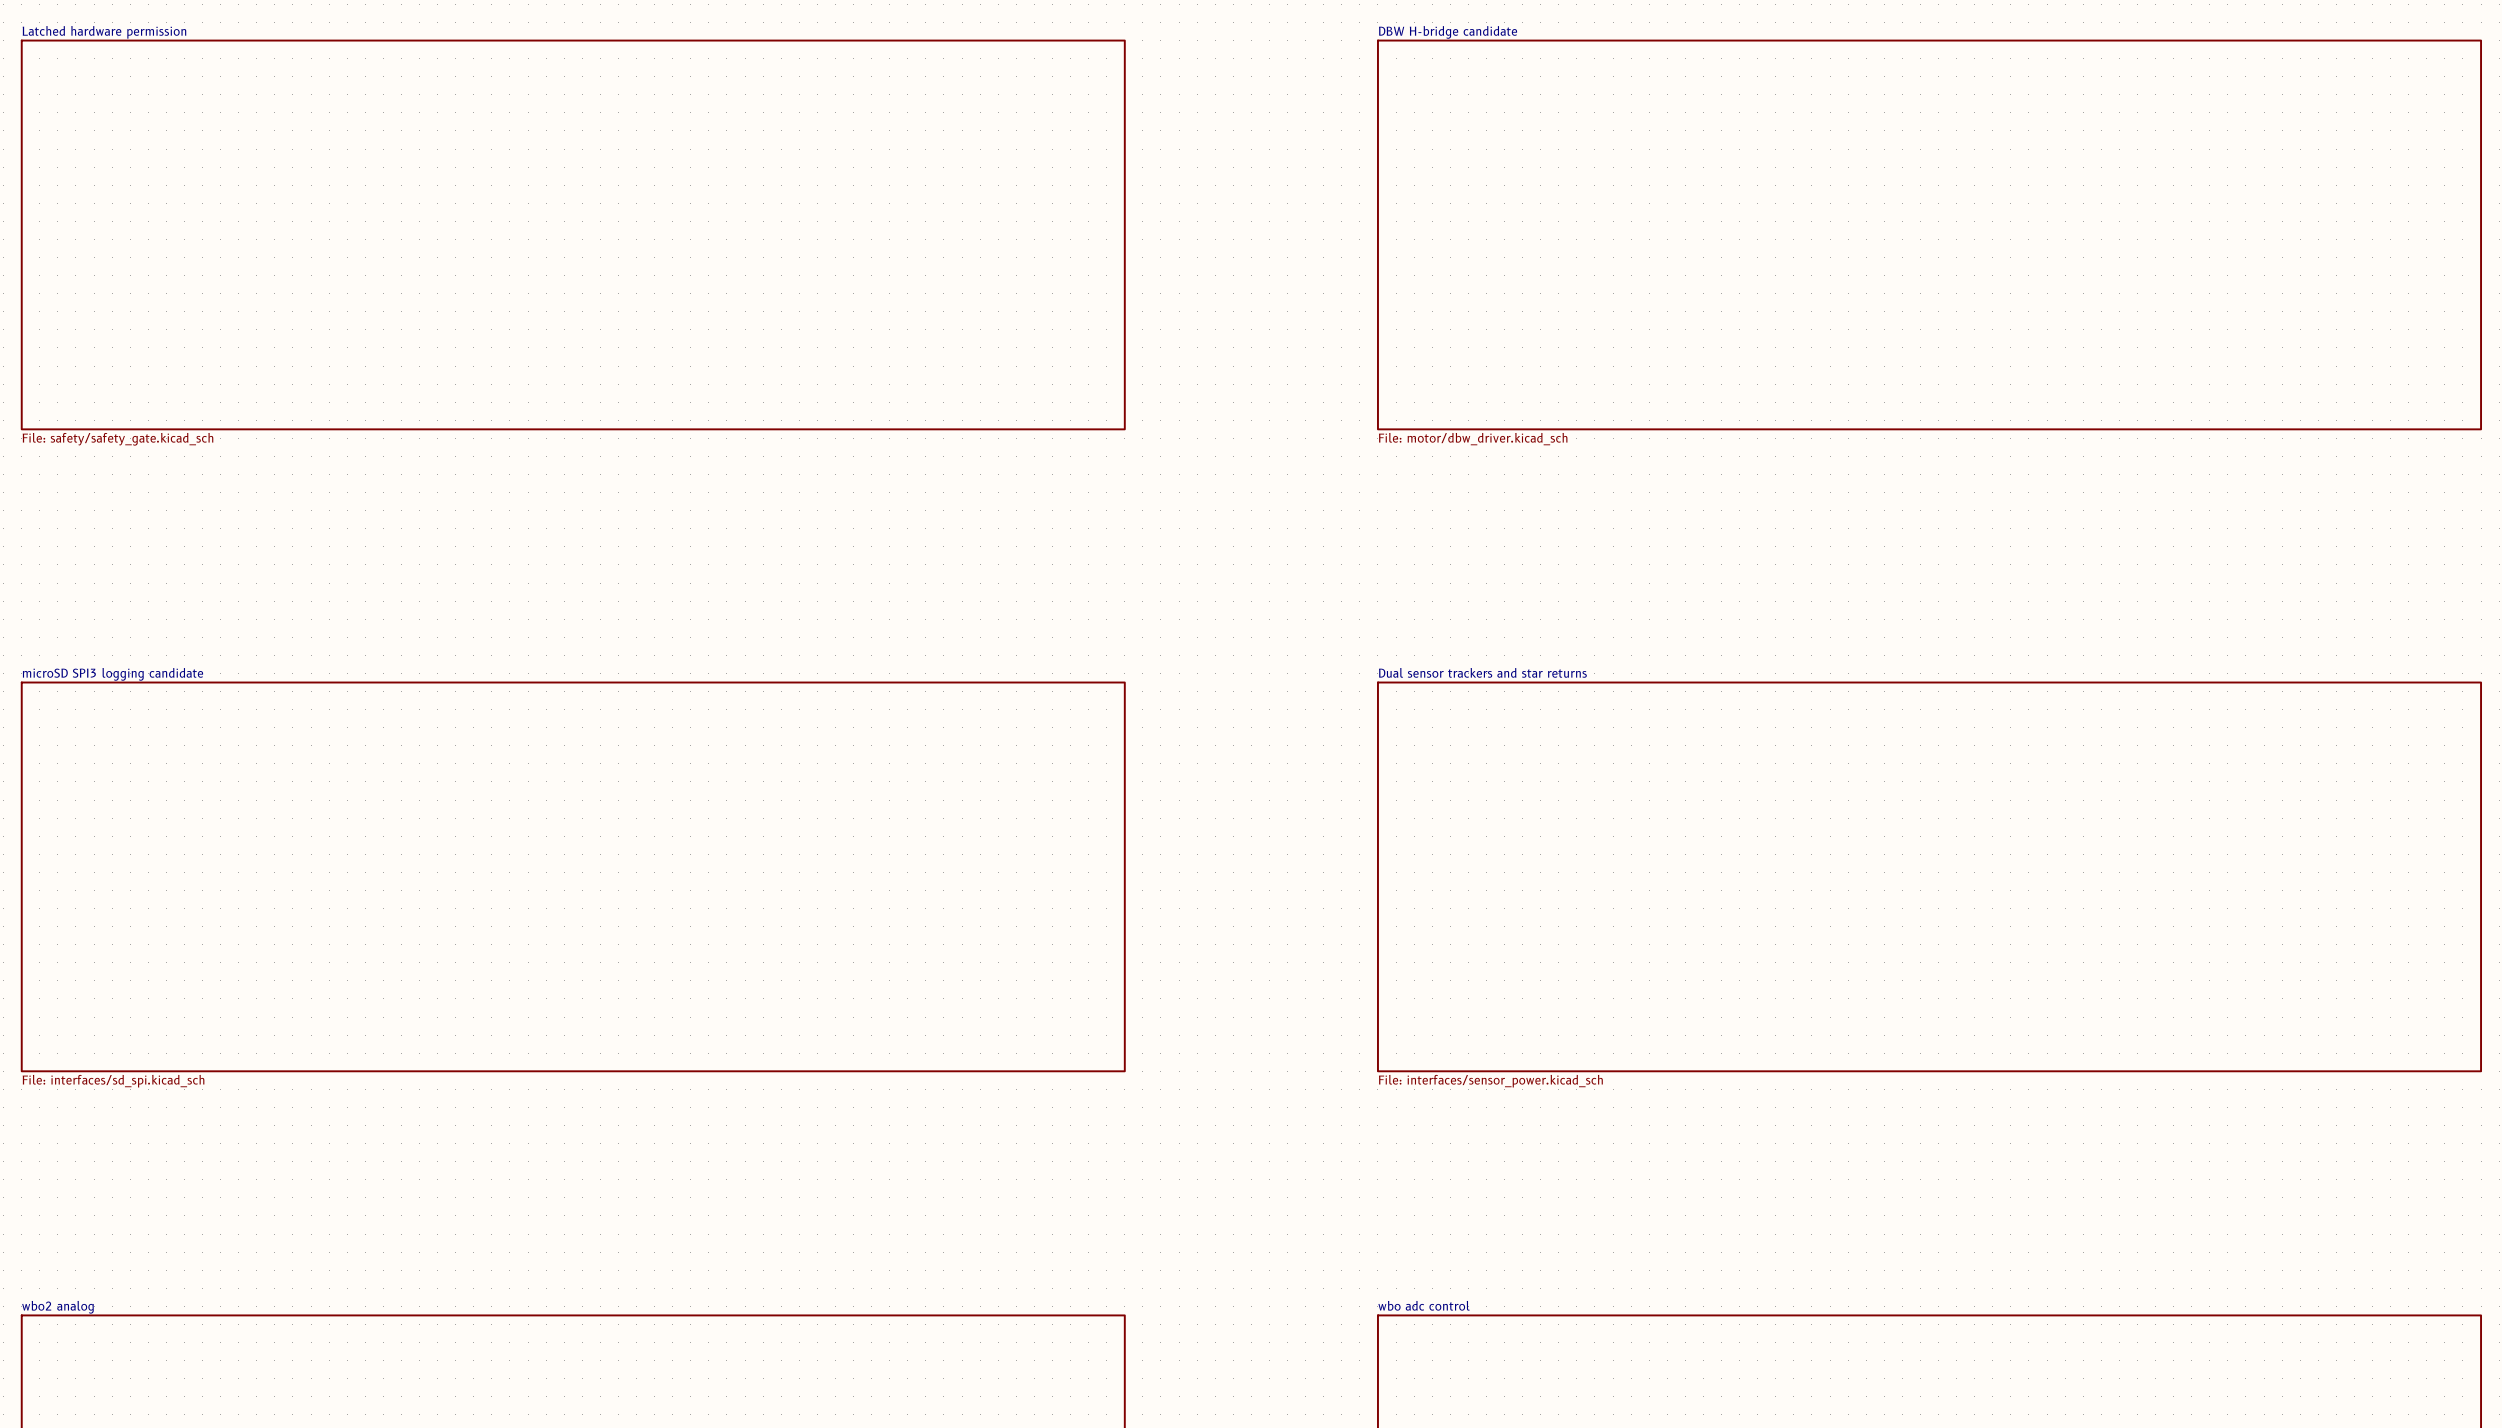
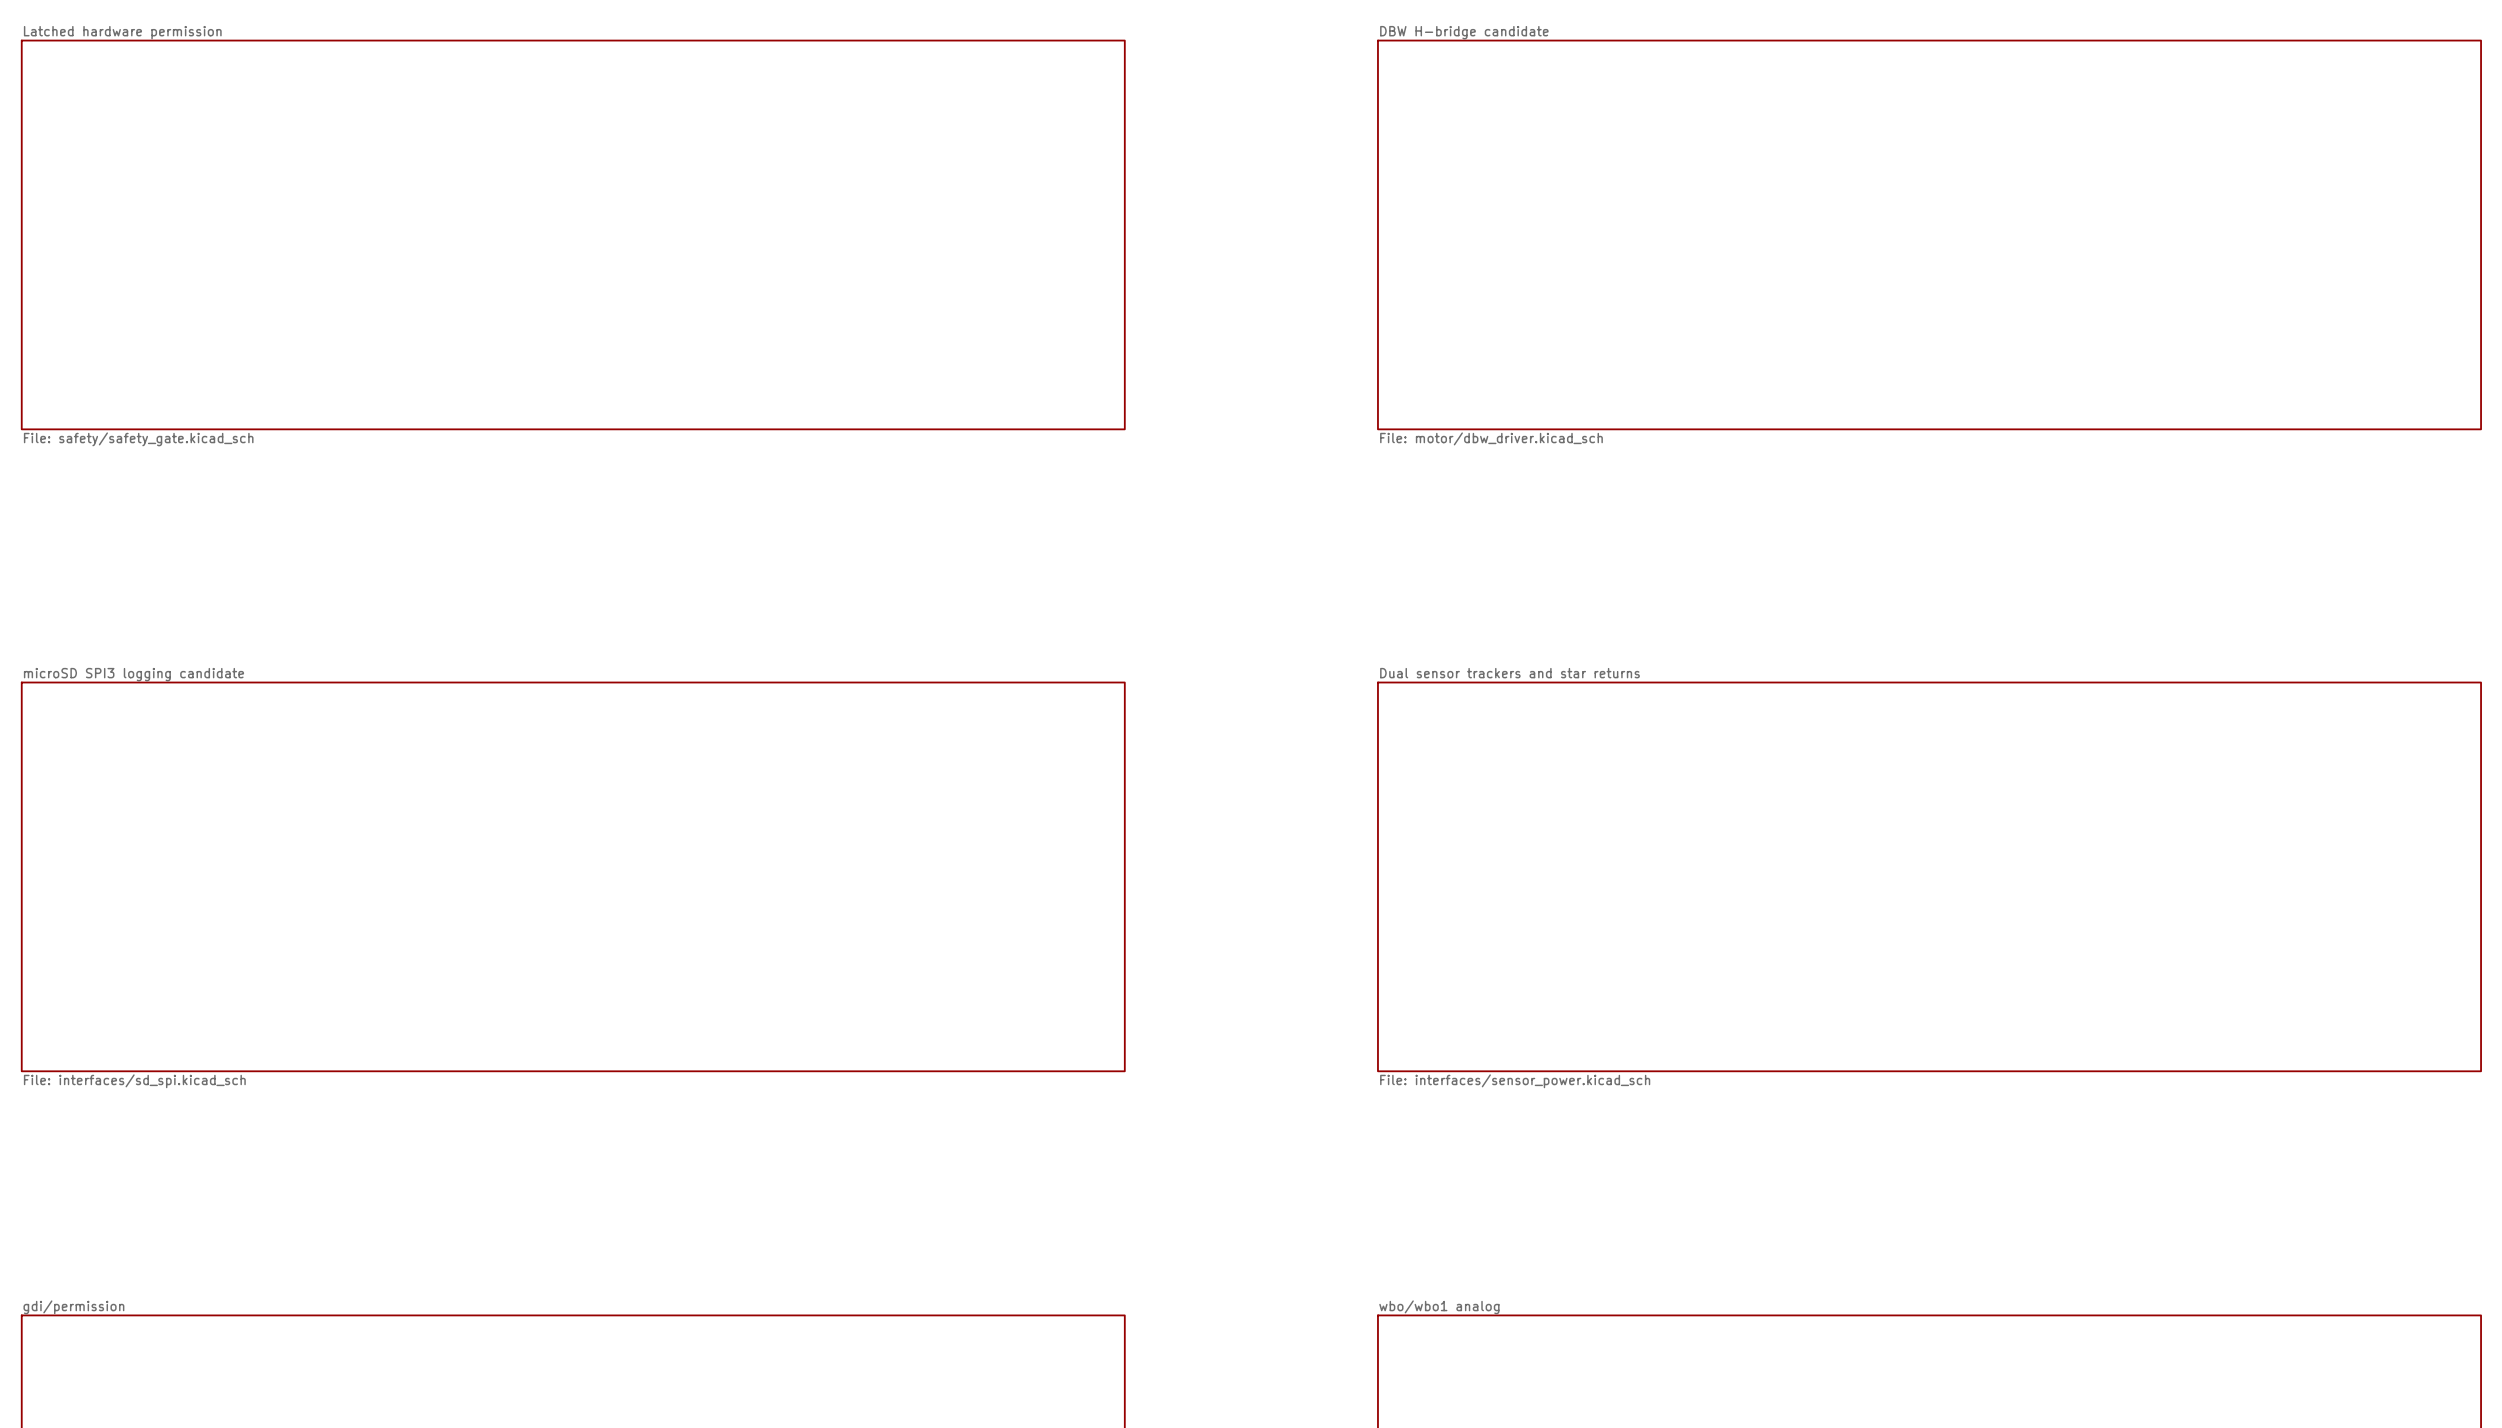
sheet wbo adc control name: wbo adc control (1424, 1305) -> wbo/wbo1 analog (1439, 1307)
sheet wbo2 analog name: wbo2 analog (57, 1307) -> gdi/permission (73, 1307)

